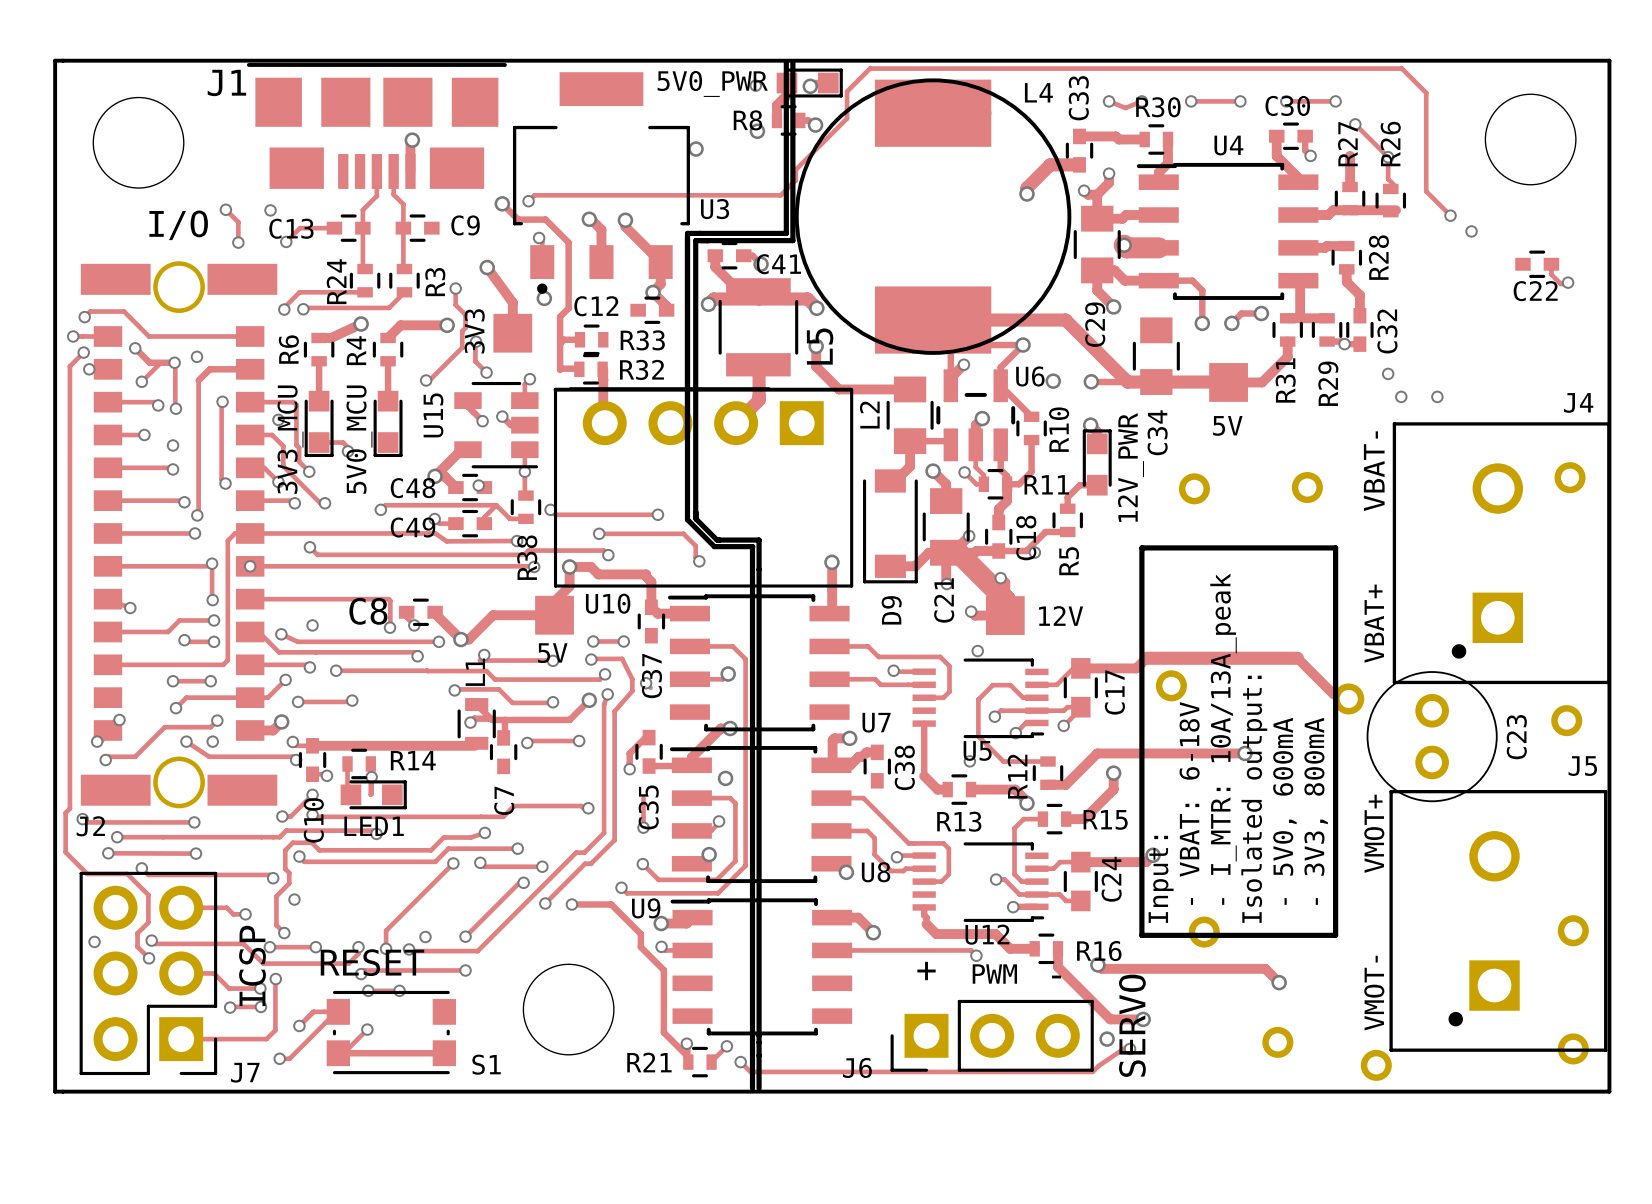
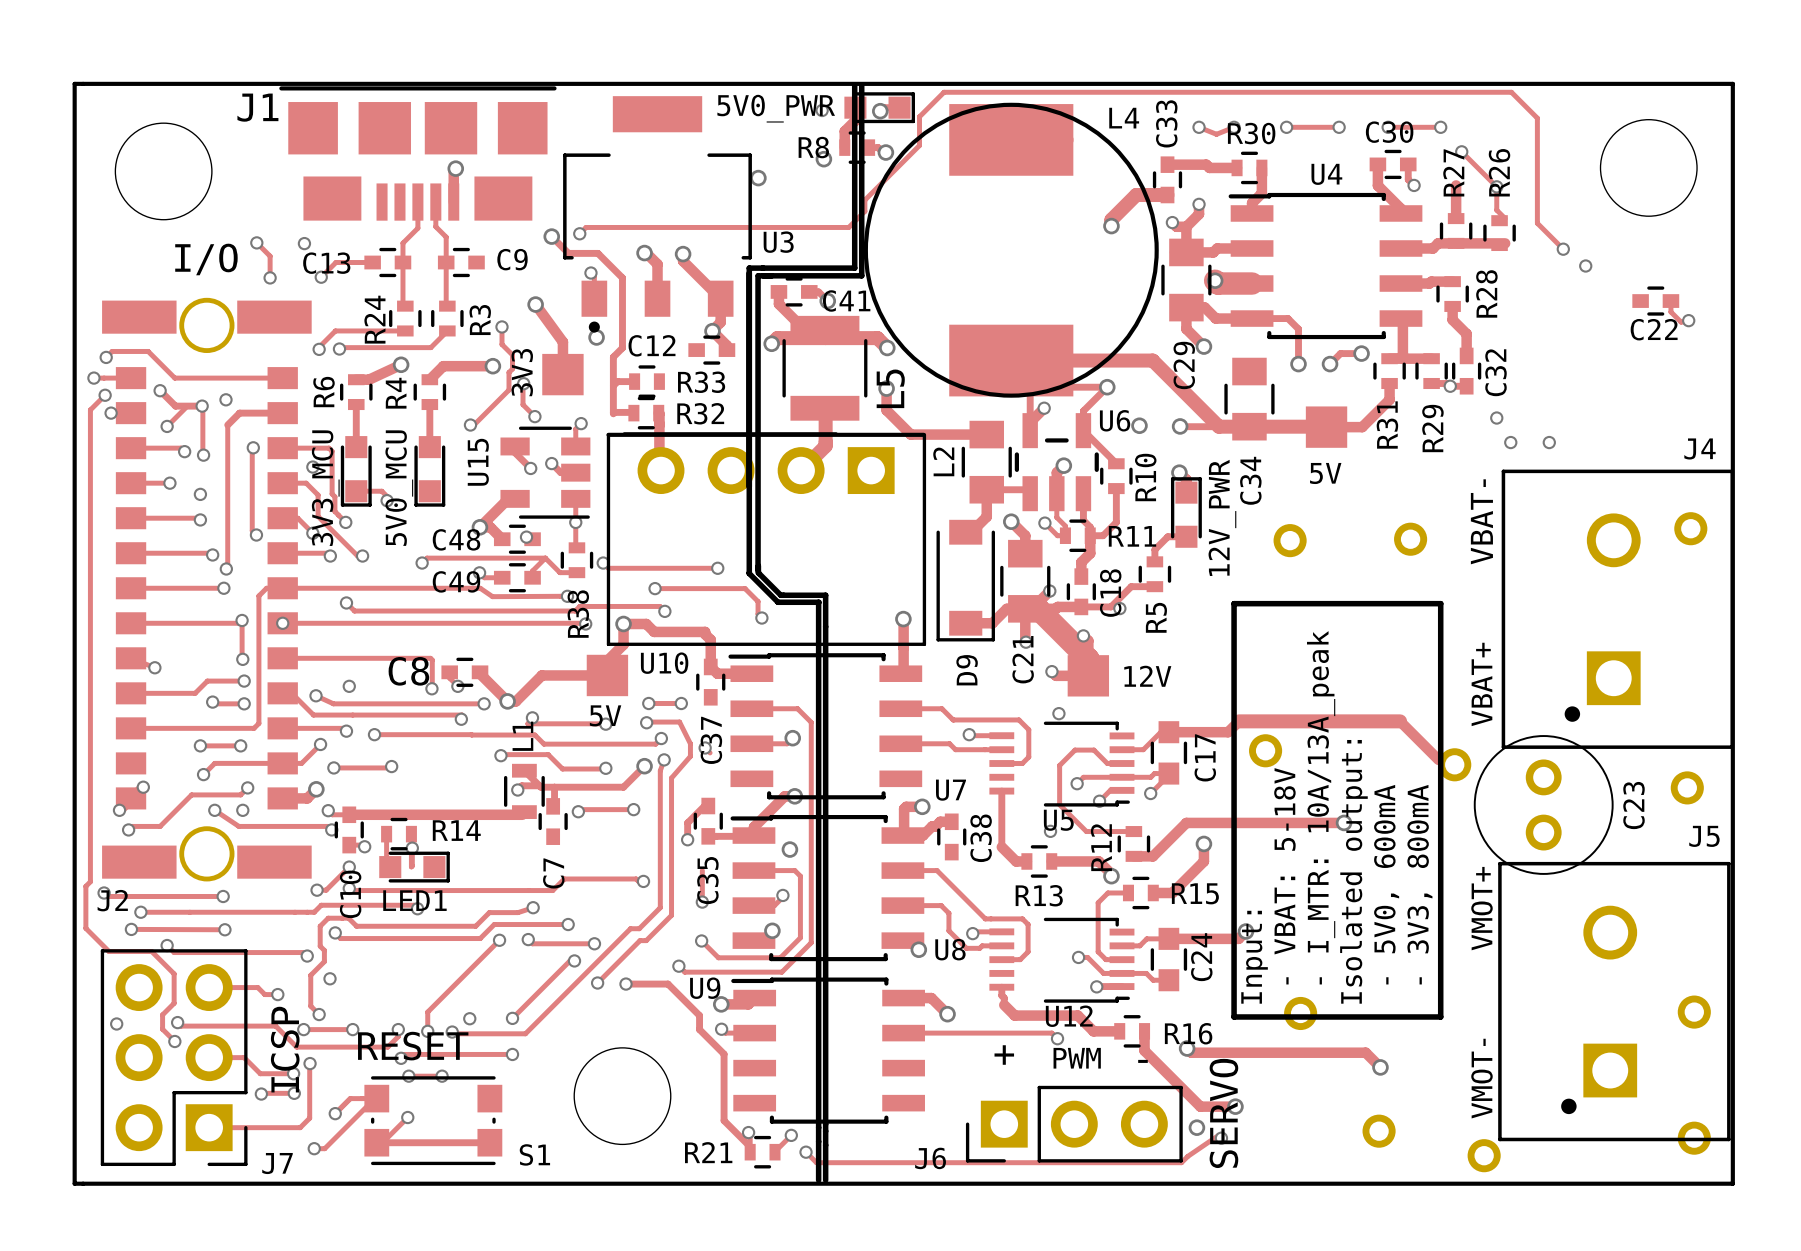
text: - VBAT: 6-18V (1189, 803) -> - VBAT: 5-18V (1284, 876)

